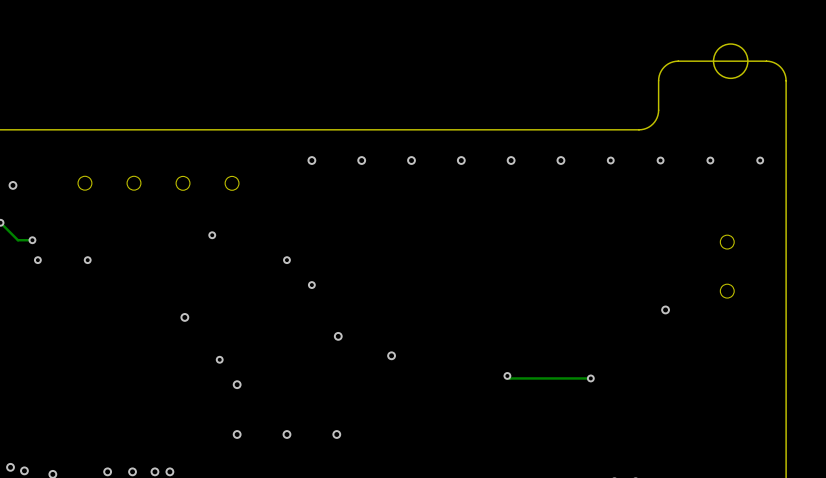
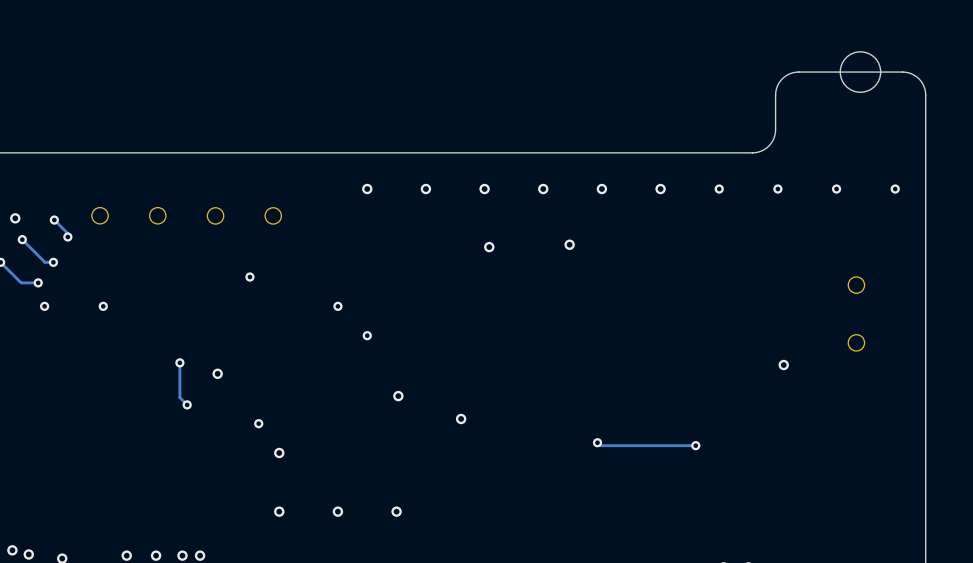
track: none -> (54, 220) (67, 233) (67, 237)
via: none -> (54, 220)
via: none -> (67, 237)
track: none -> (22, 239) (45, 262) (53, 262)
via: none -> (22, 239)
via: none -> (569, 244)
via: none -> (489, 247)
via: none -> (53, 262)
track: none -> (179, 362) (179, 397) (187, 404)
via: none -> (179, 362)
via: none -> (187, 404)

